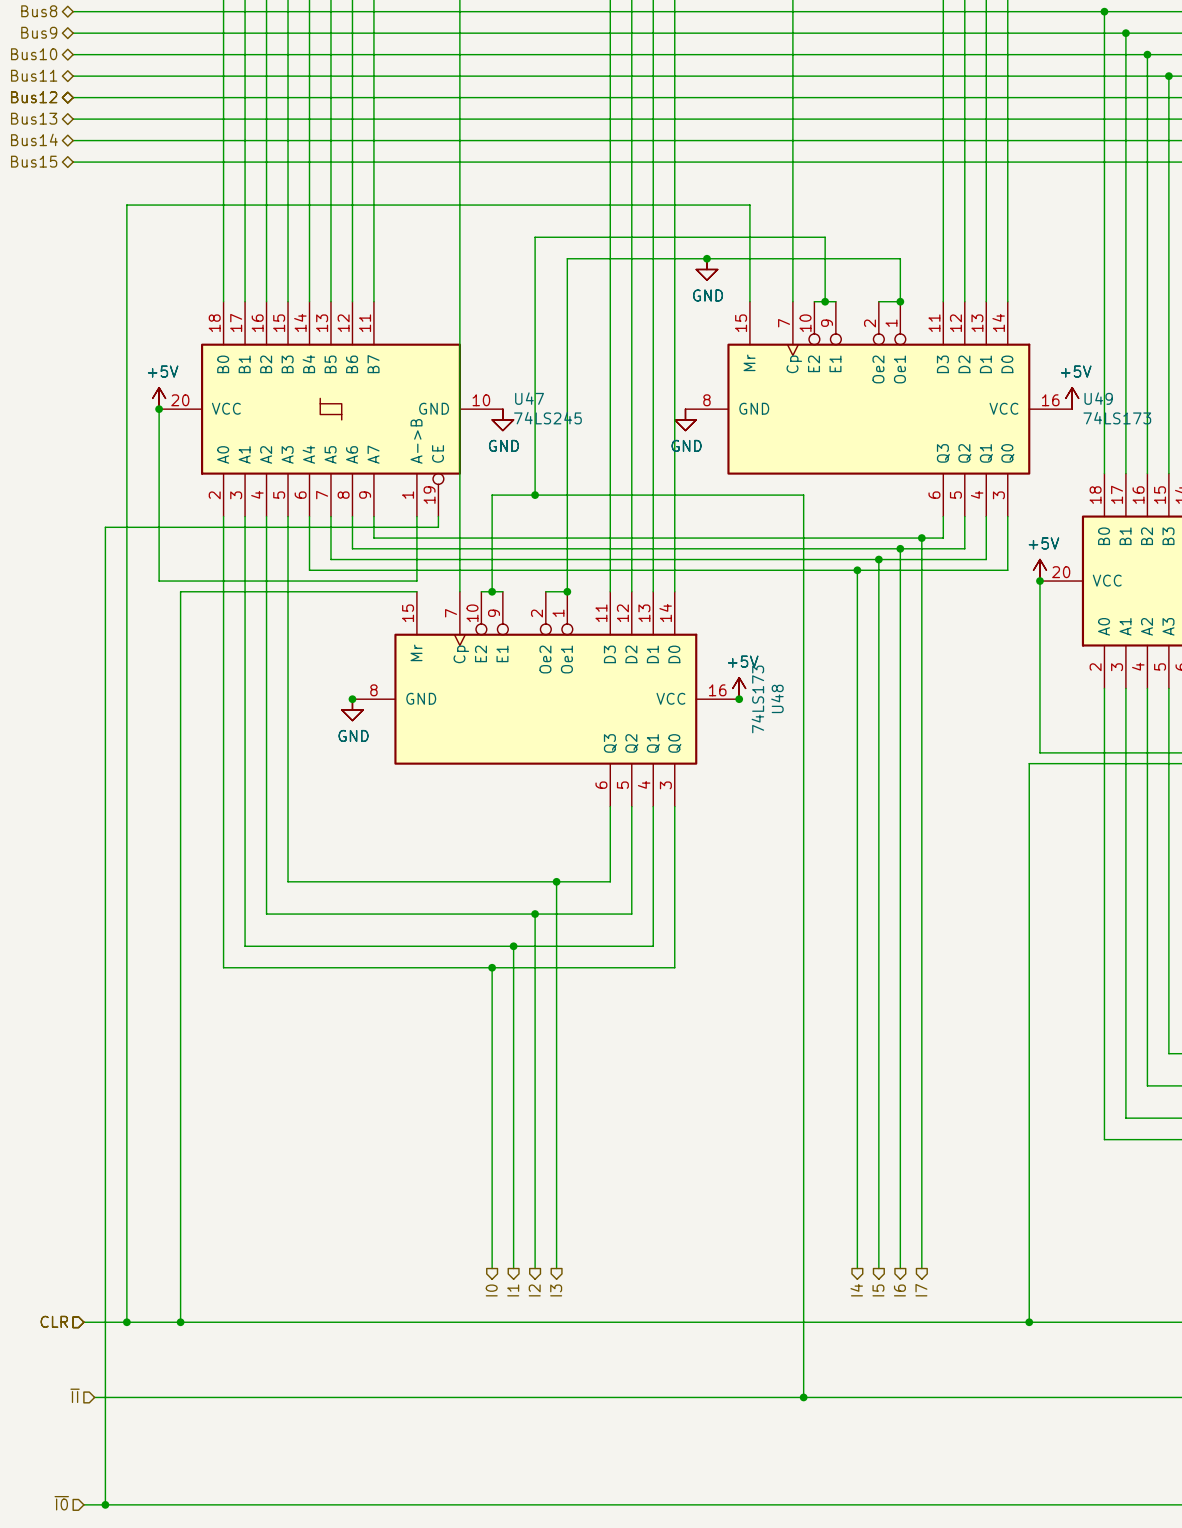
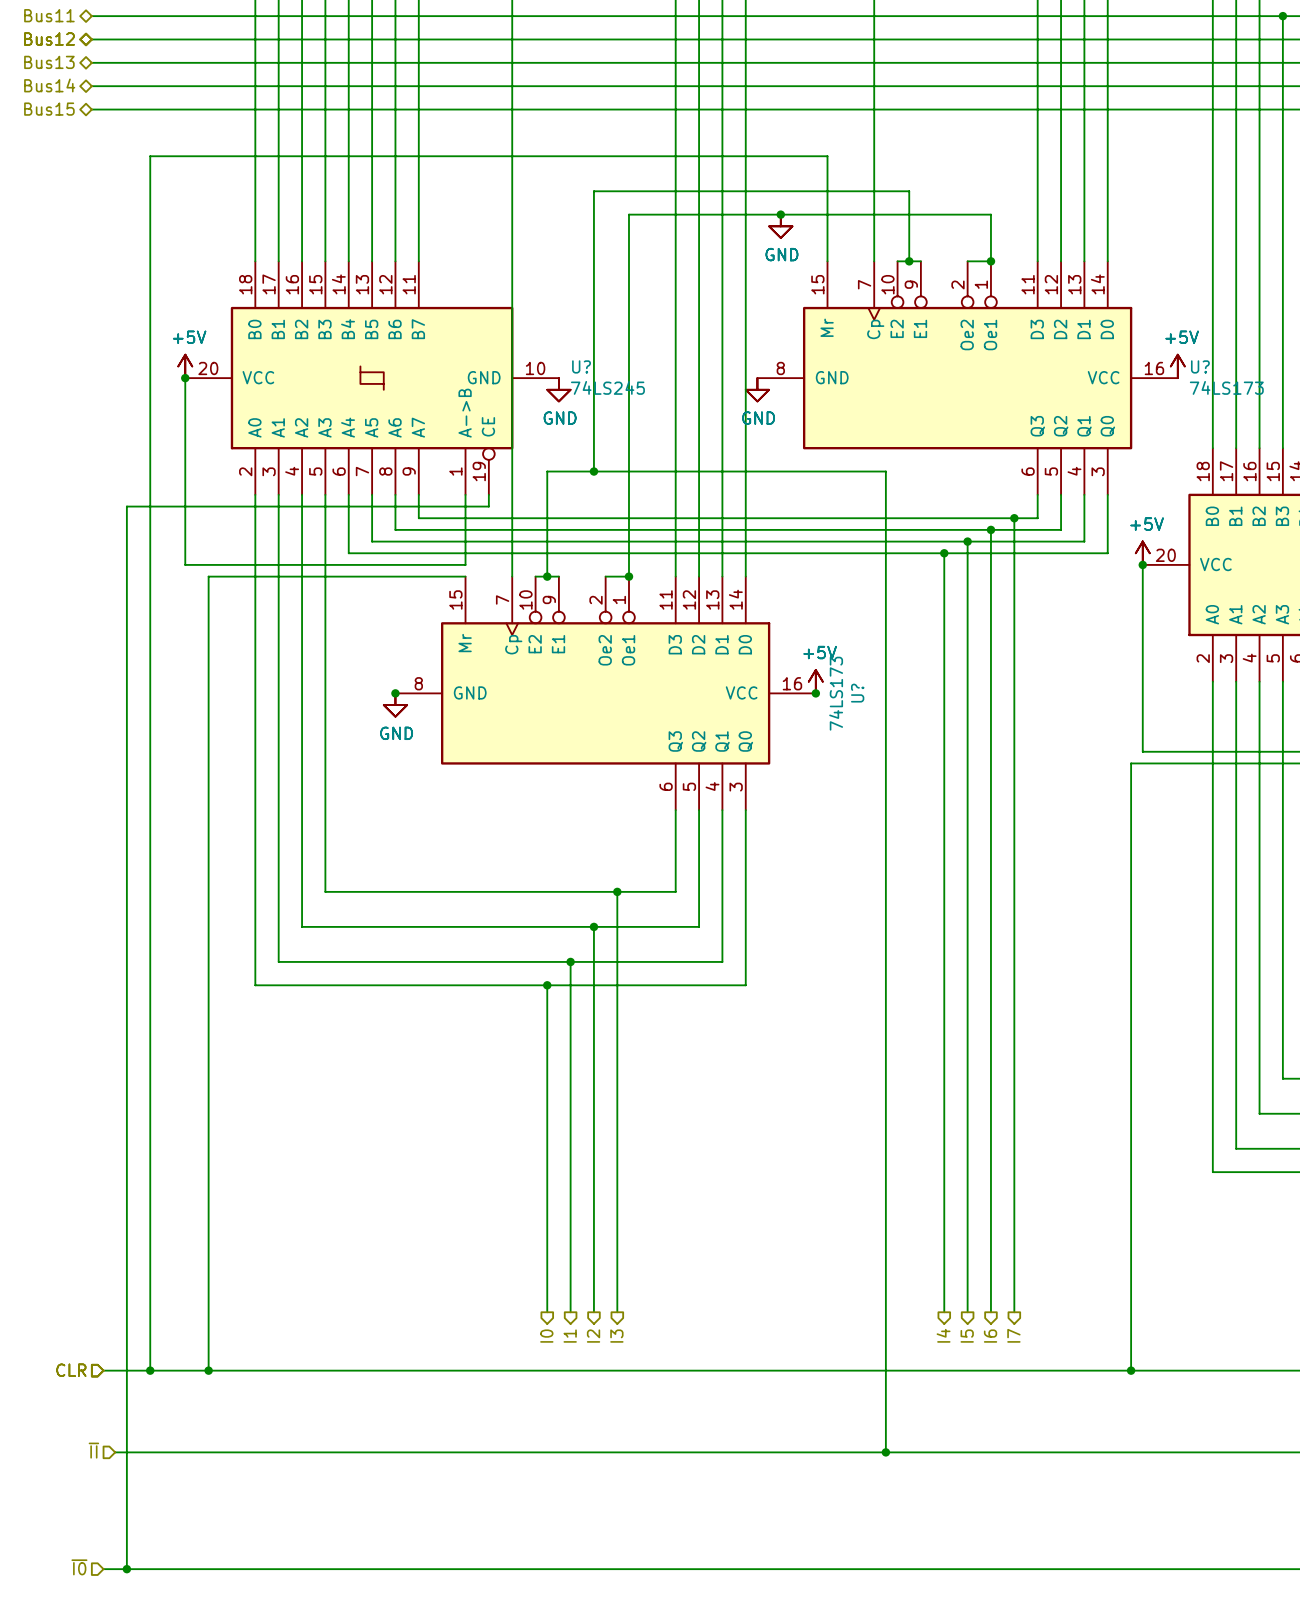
U47 name: U47 (529, 398) -> U? (581, 366)
U49 name: U49 (1098, 398) -> U? (1200, 366)
U48 name: U48 (777, 698) -> U? (857, 693)

